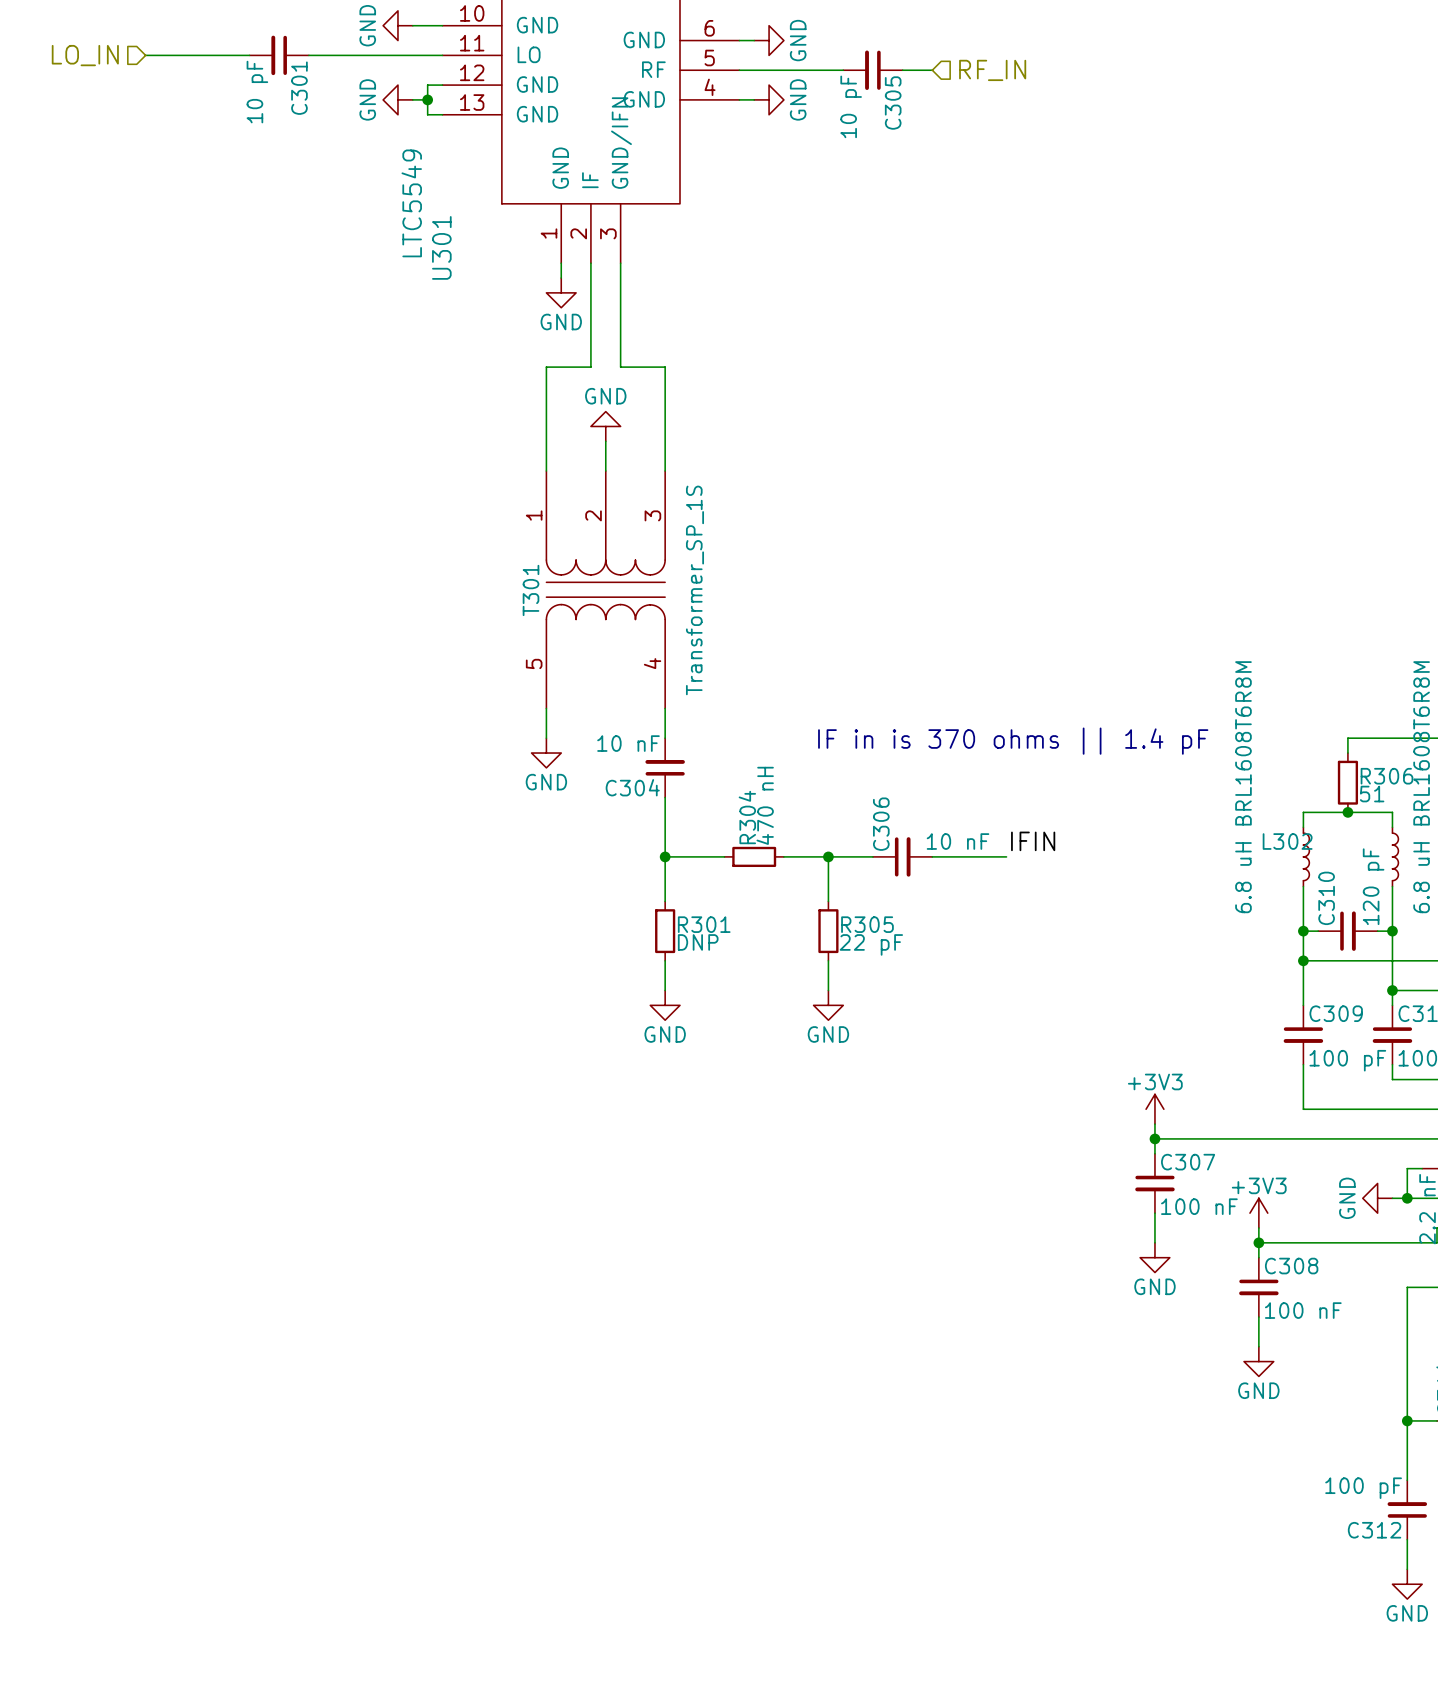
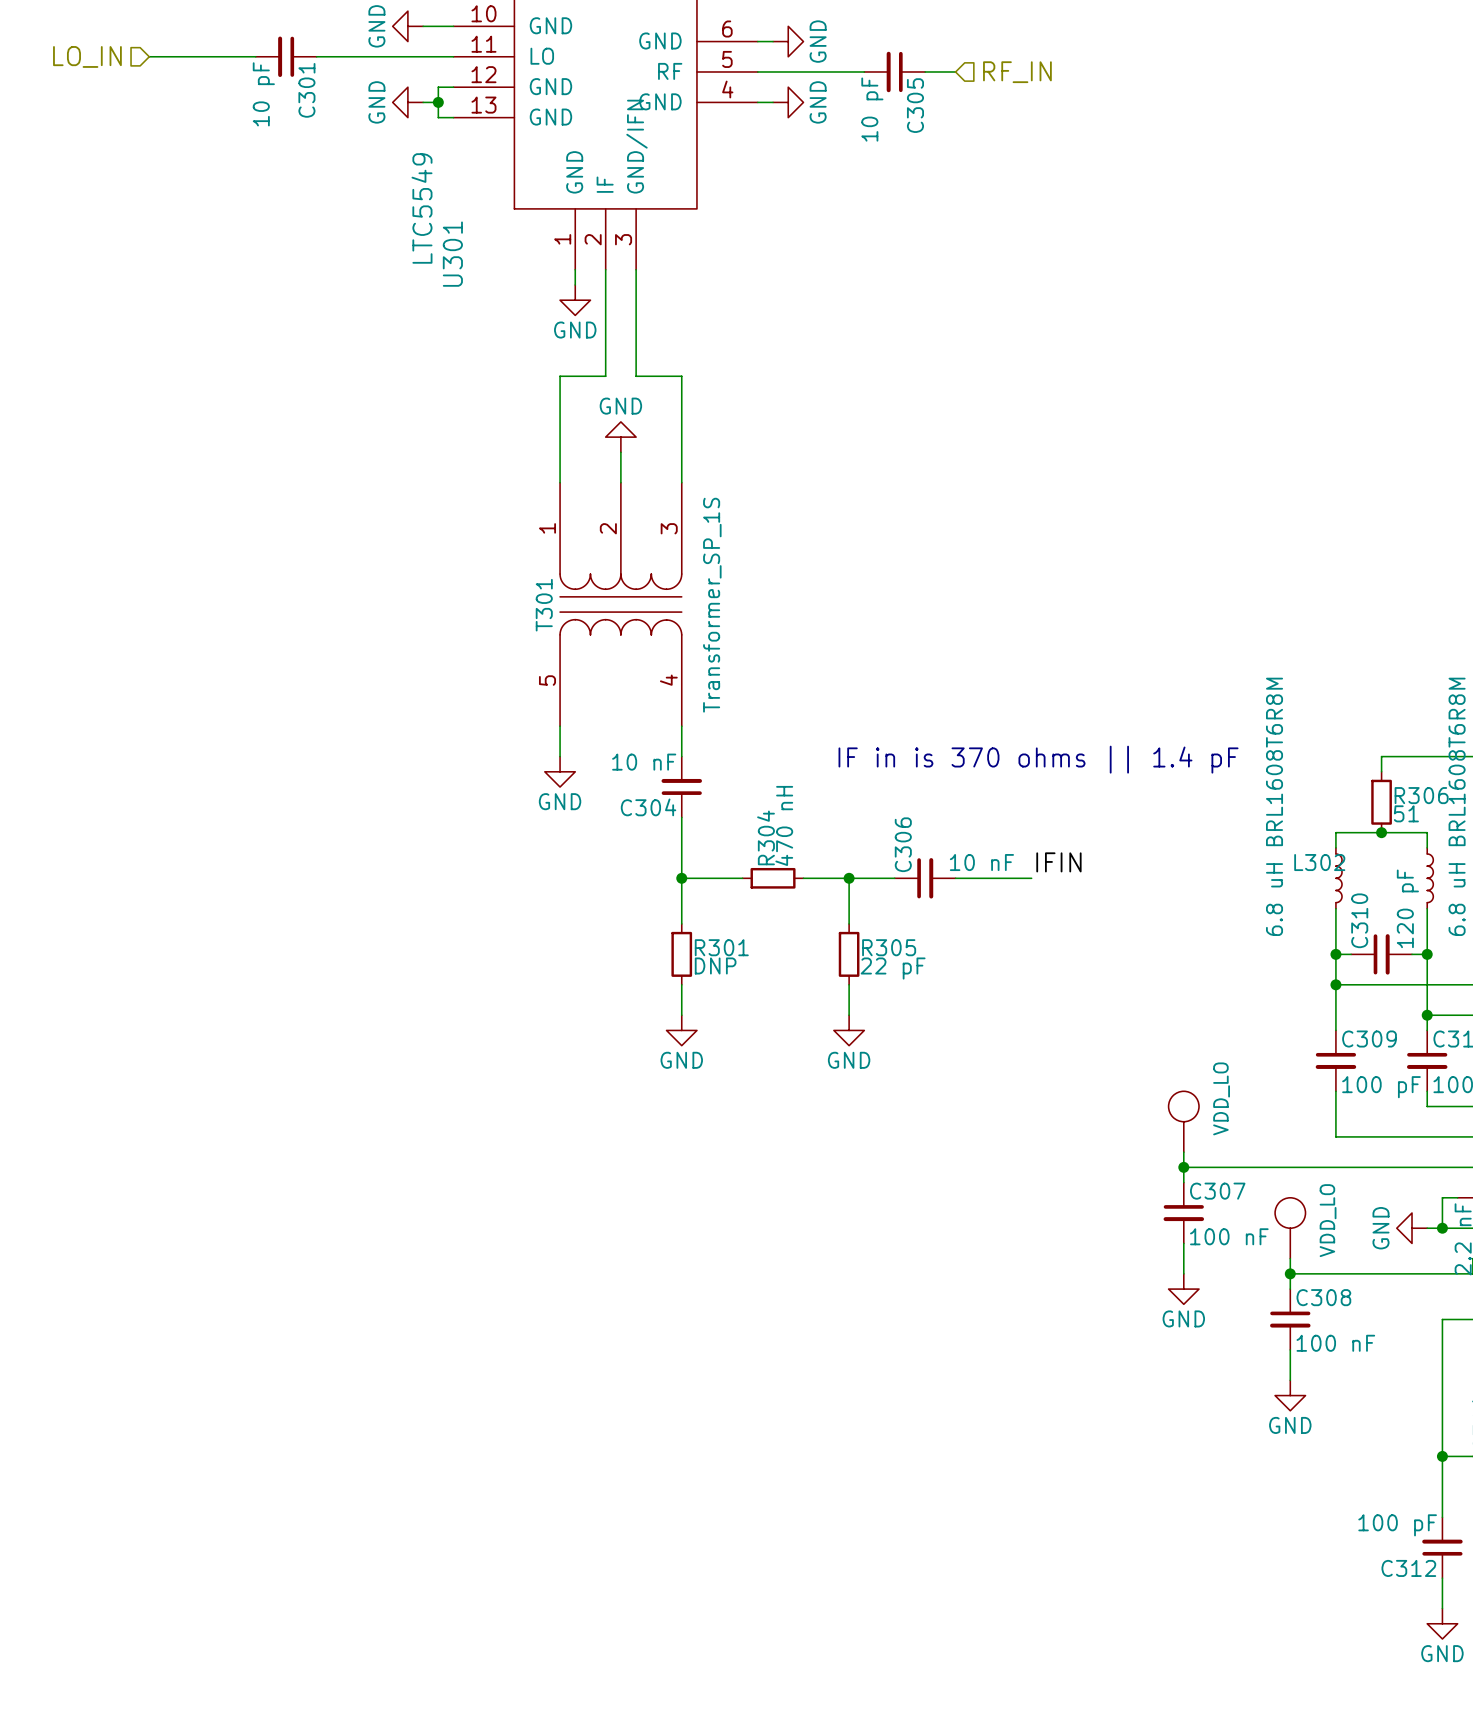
power symbol: none -> VDD_LO (1183, 1121)
power symbol: +3V3 (1154, 1109) -> none
power symbol: none -> VDD_LO (1290, 1228)
power symbol: +3V3 (1258, 1213) -> none

